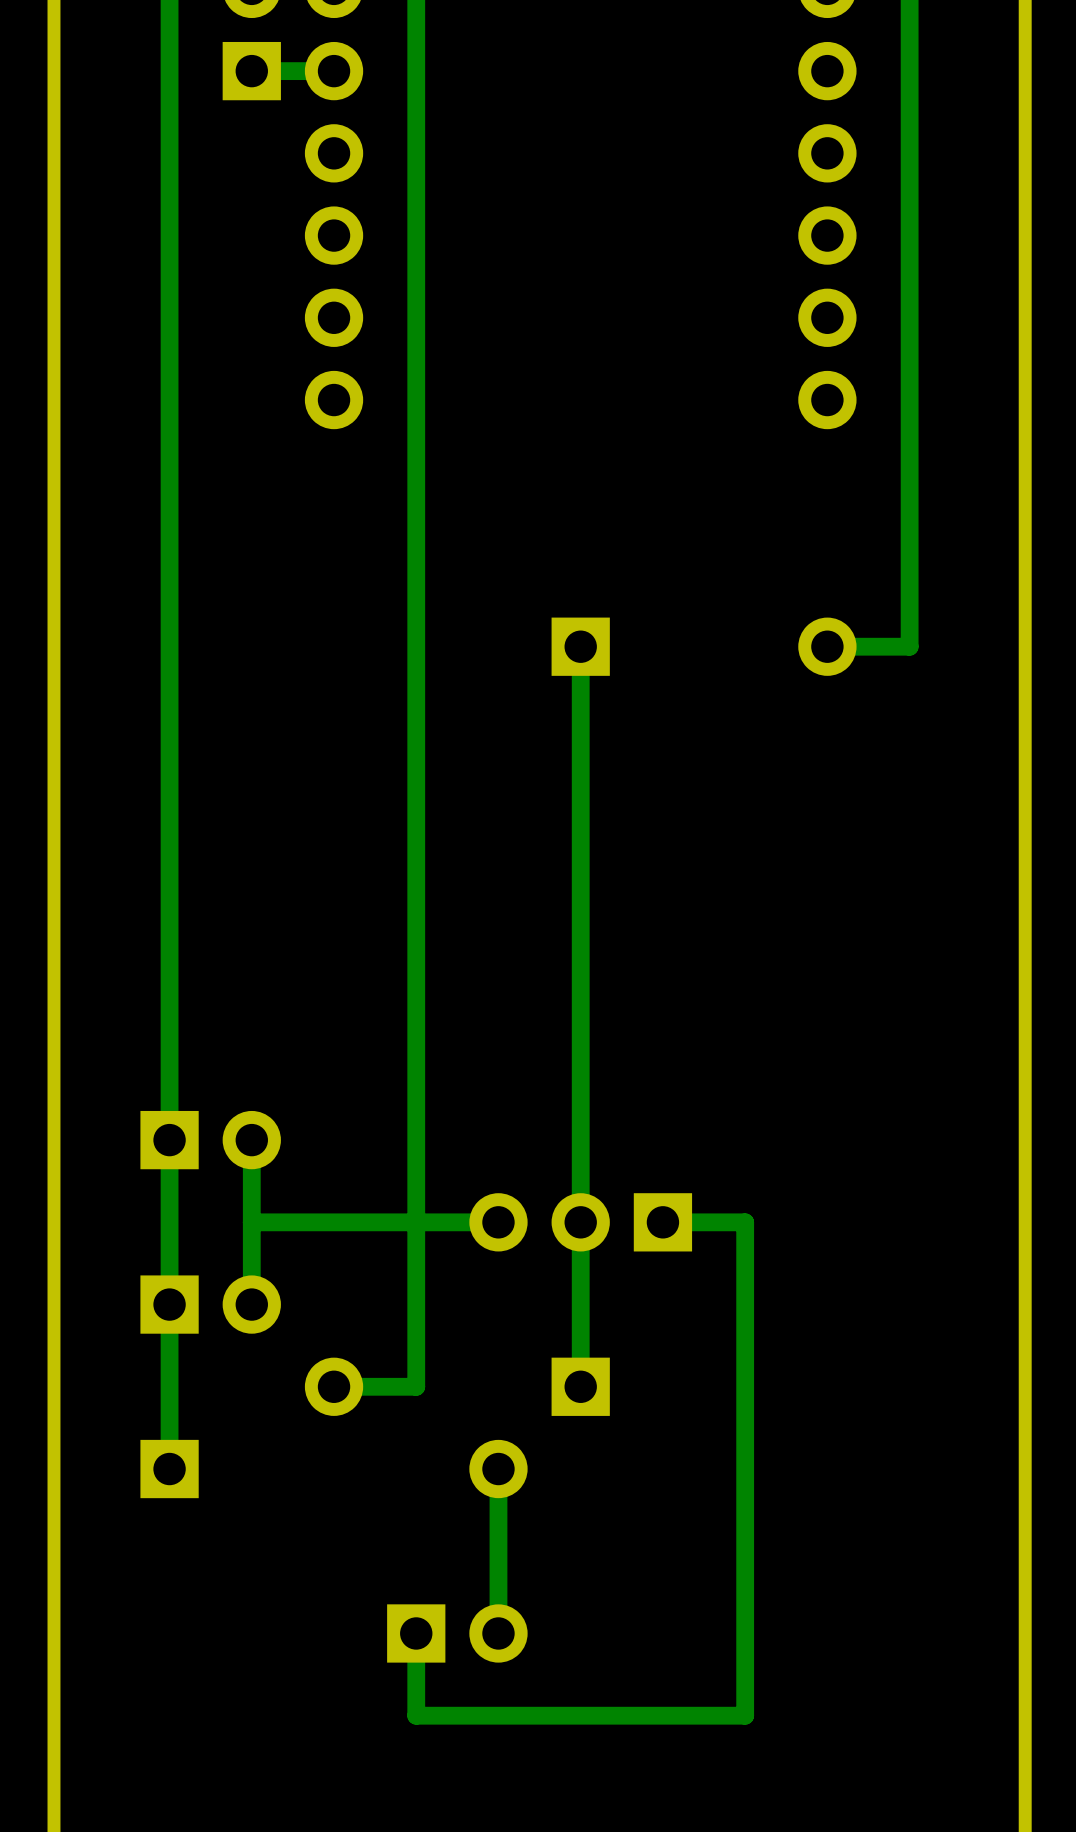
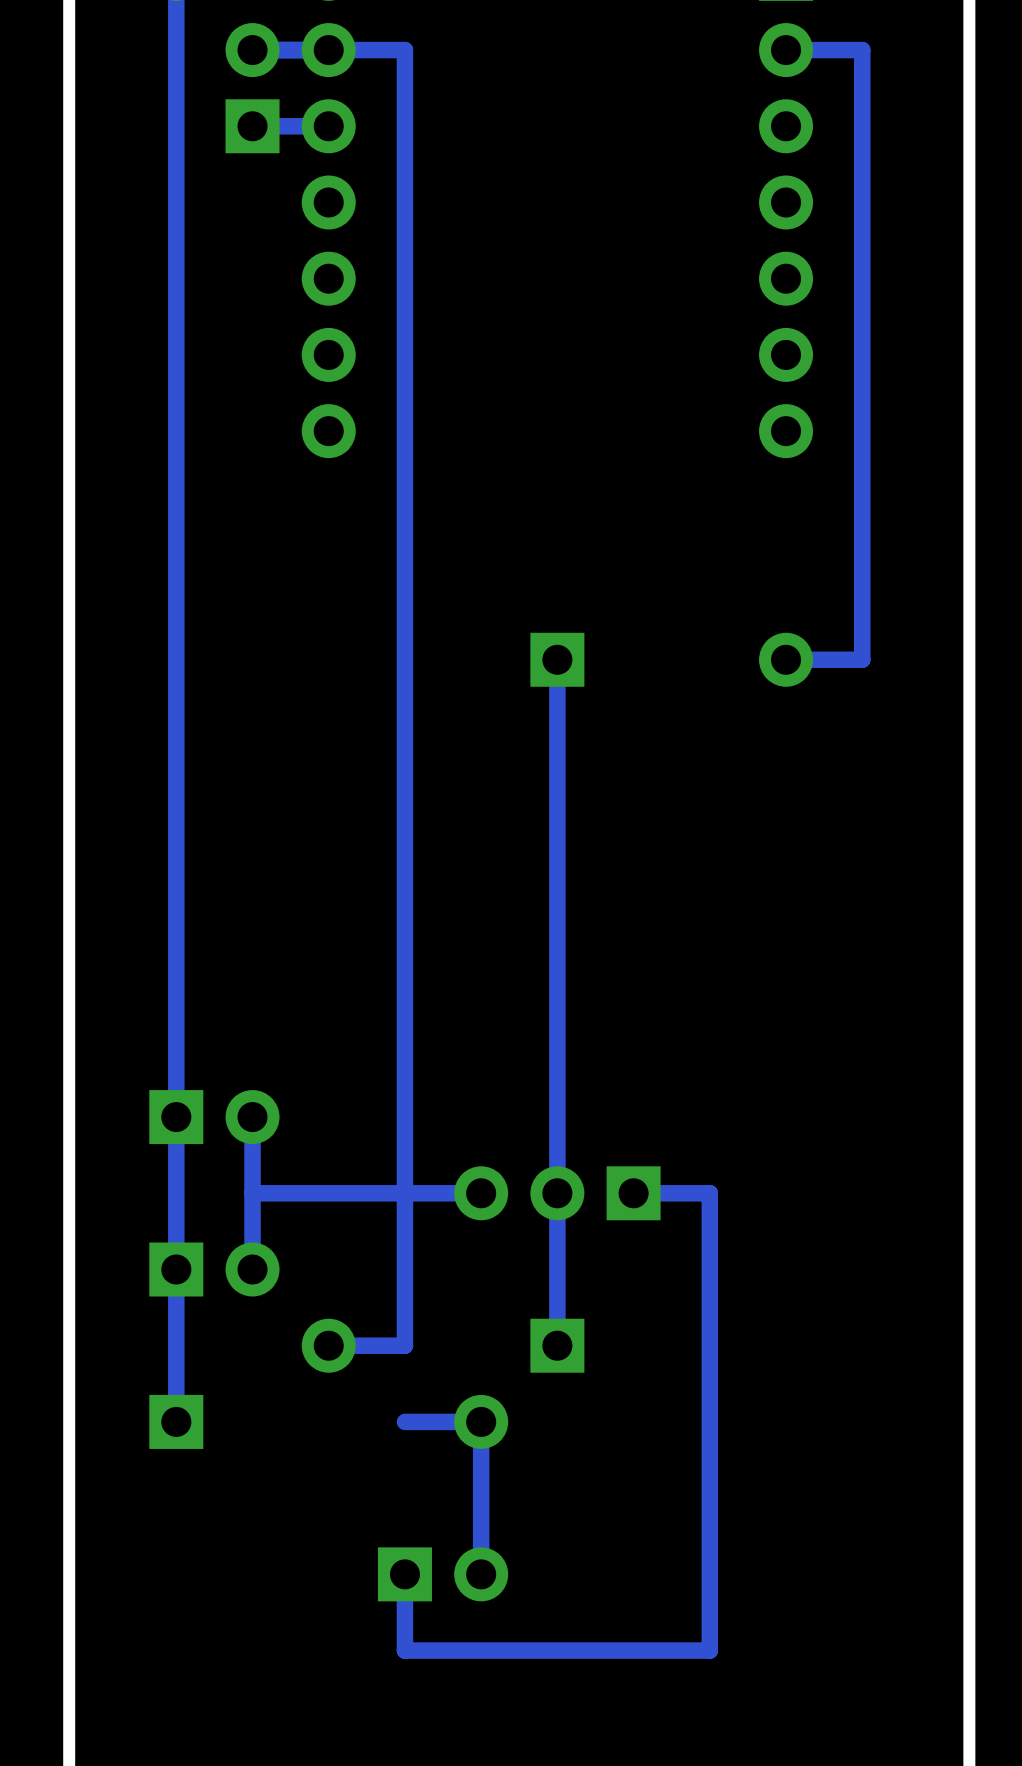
track: none -> (481, 1421) (404, 1421)

